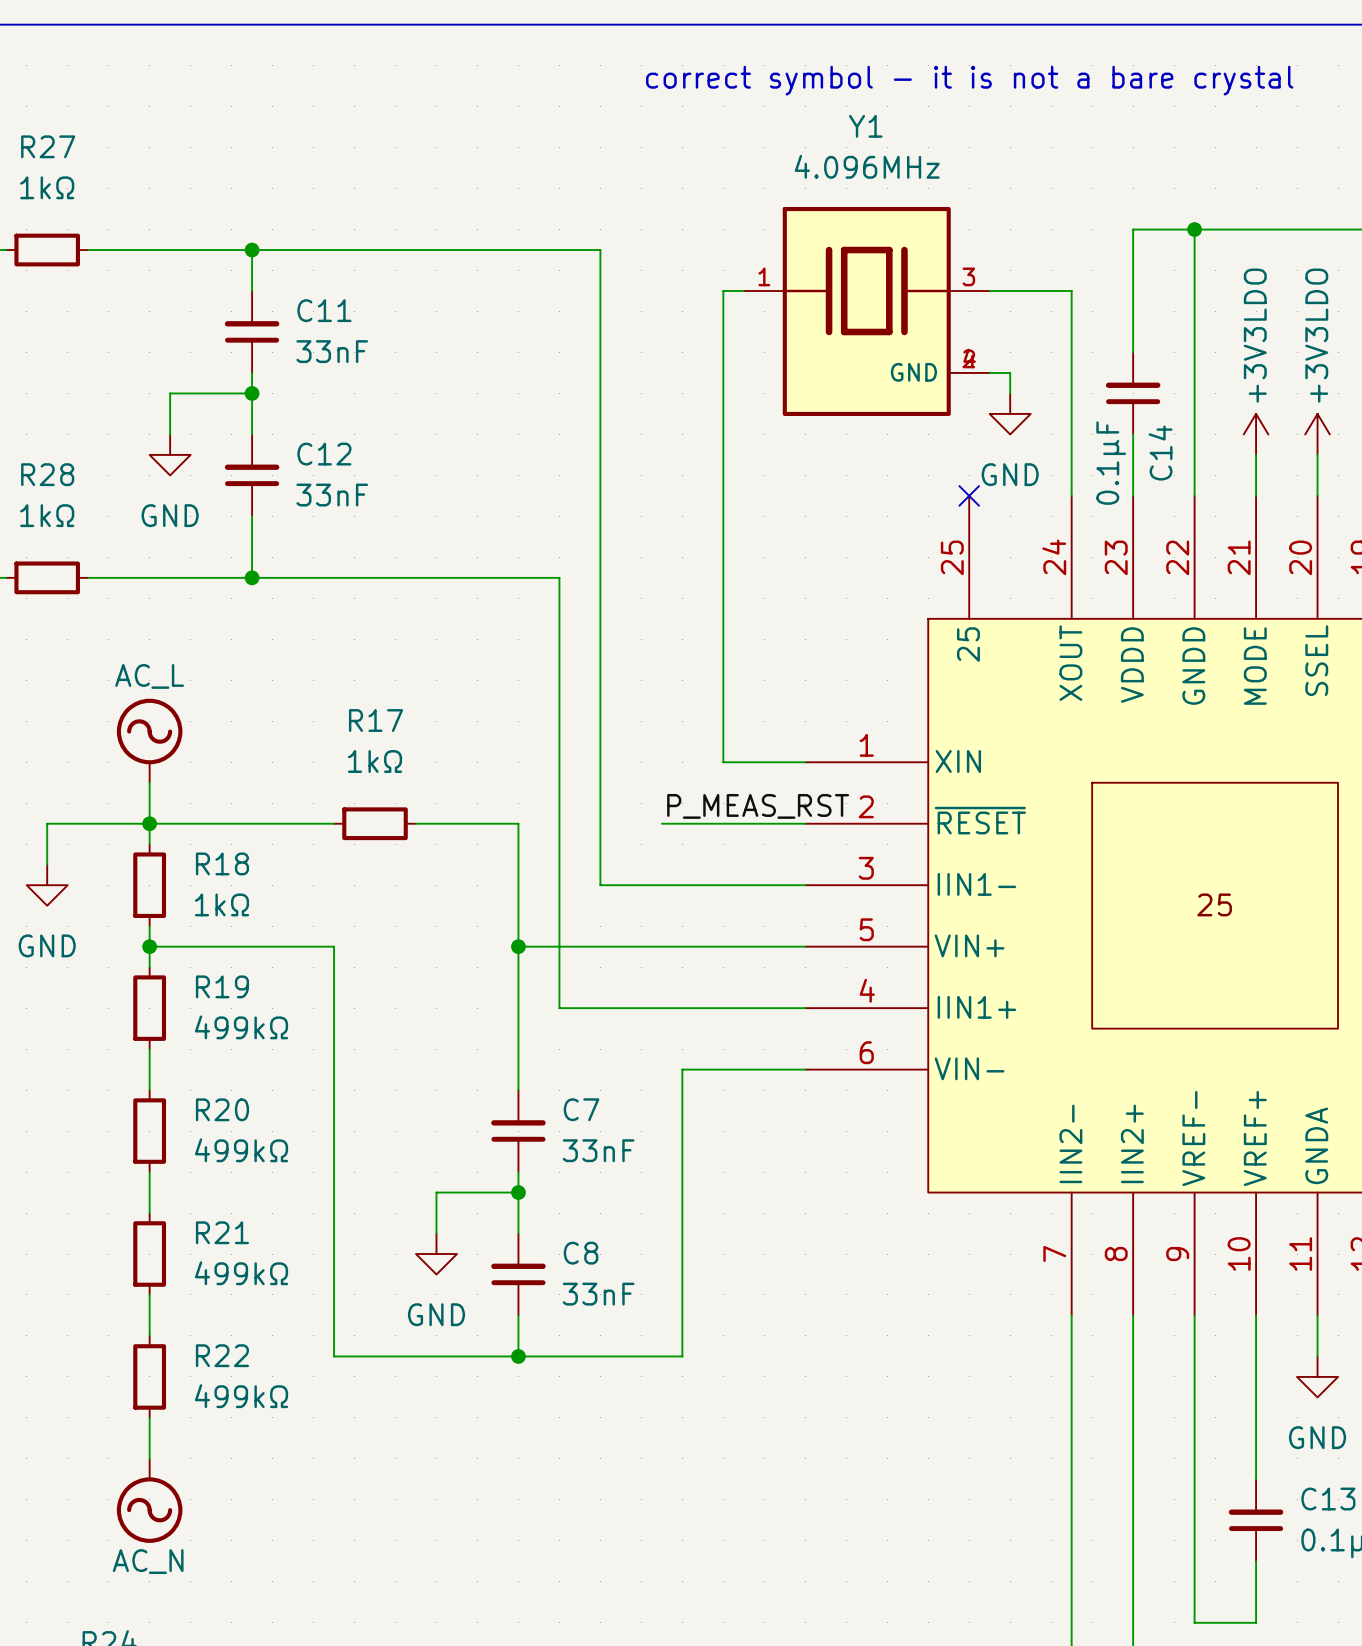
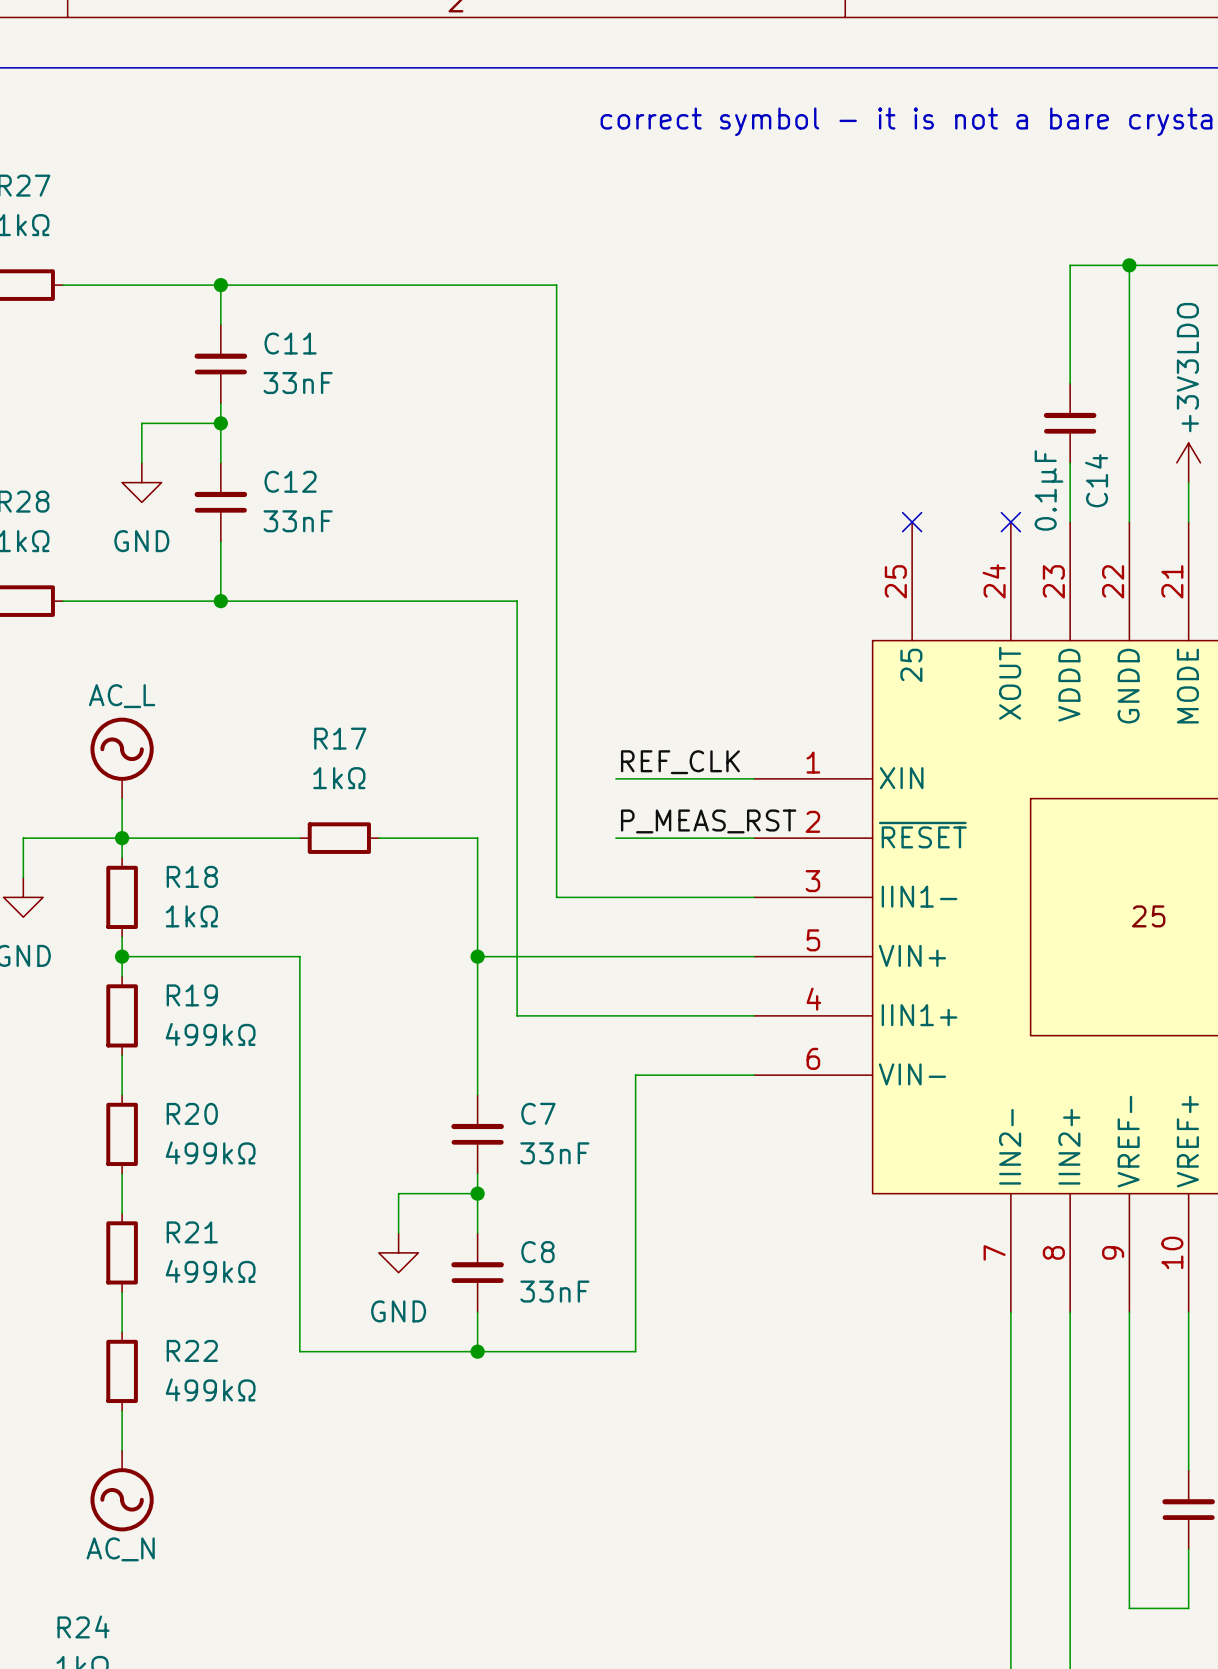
wire: (743, 291) (723, 291) (723, 762) -> (615, 778) (675, 778)
wire: (989, 291) (1071, 291) (1071, 495) -> none
Y1: (866, 311) -> none
wire: (989, 372) (1010, 372) (1010, 393) -> none
power symbol: GND (1010, 413) -> none
no-connect mark: none -> (1010, 522)
label: none -> REF_CLK (680, 762)

